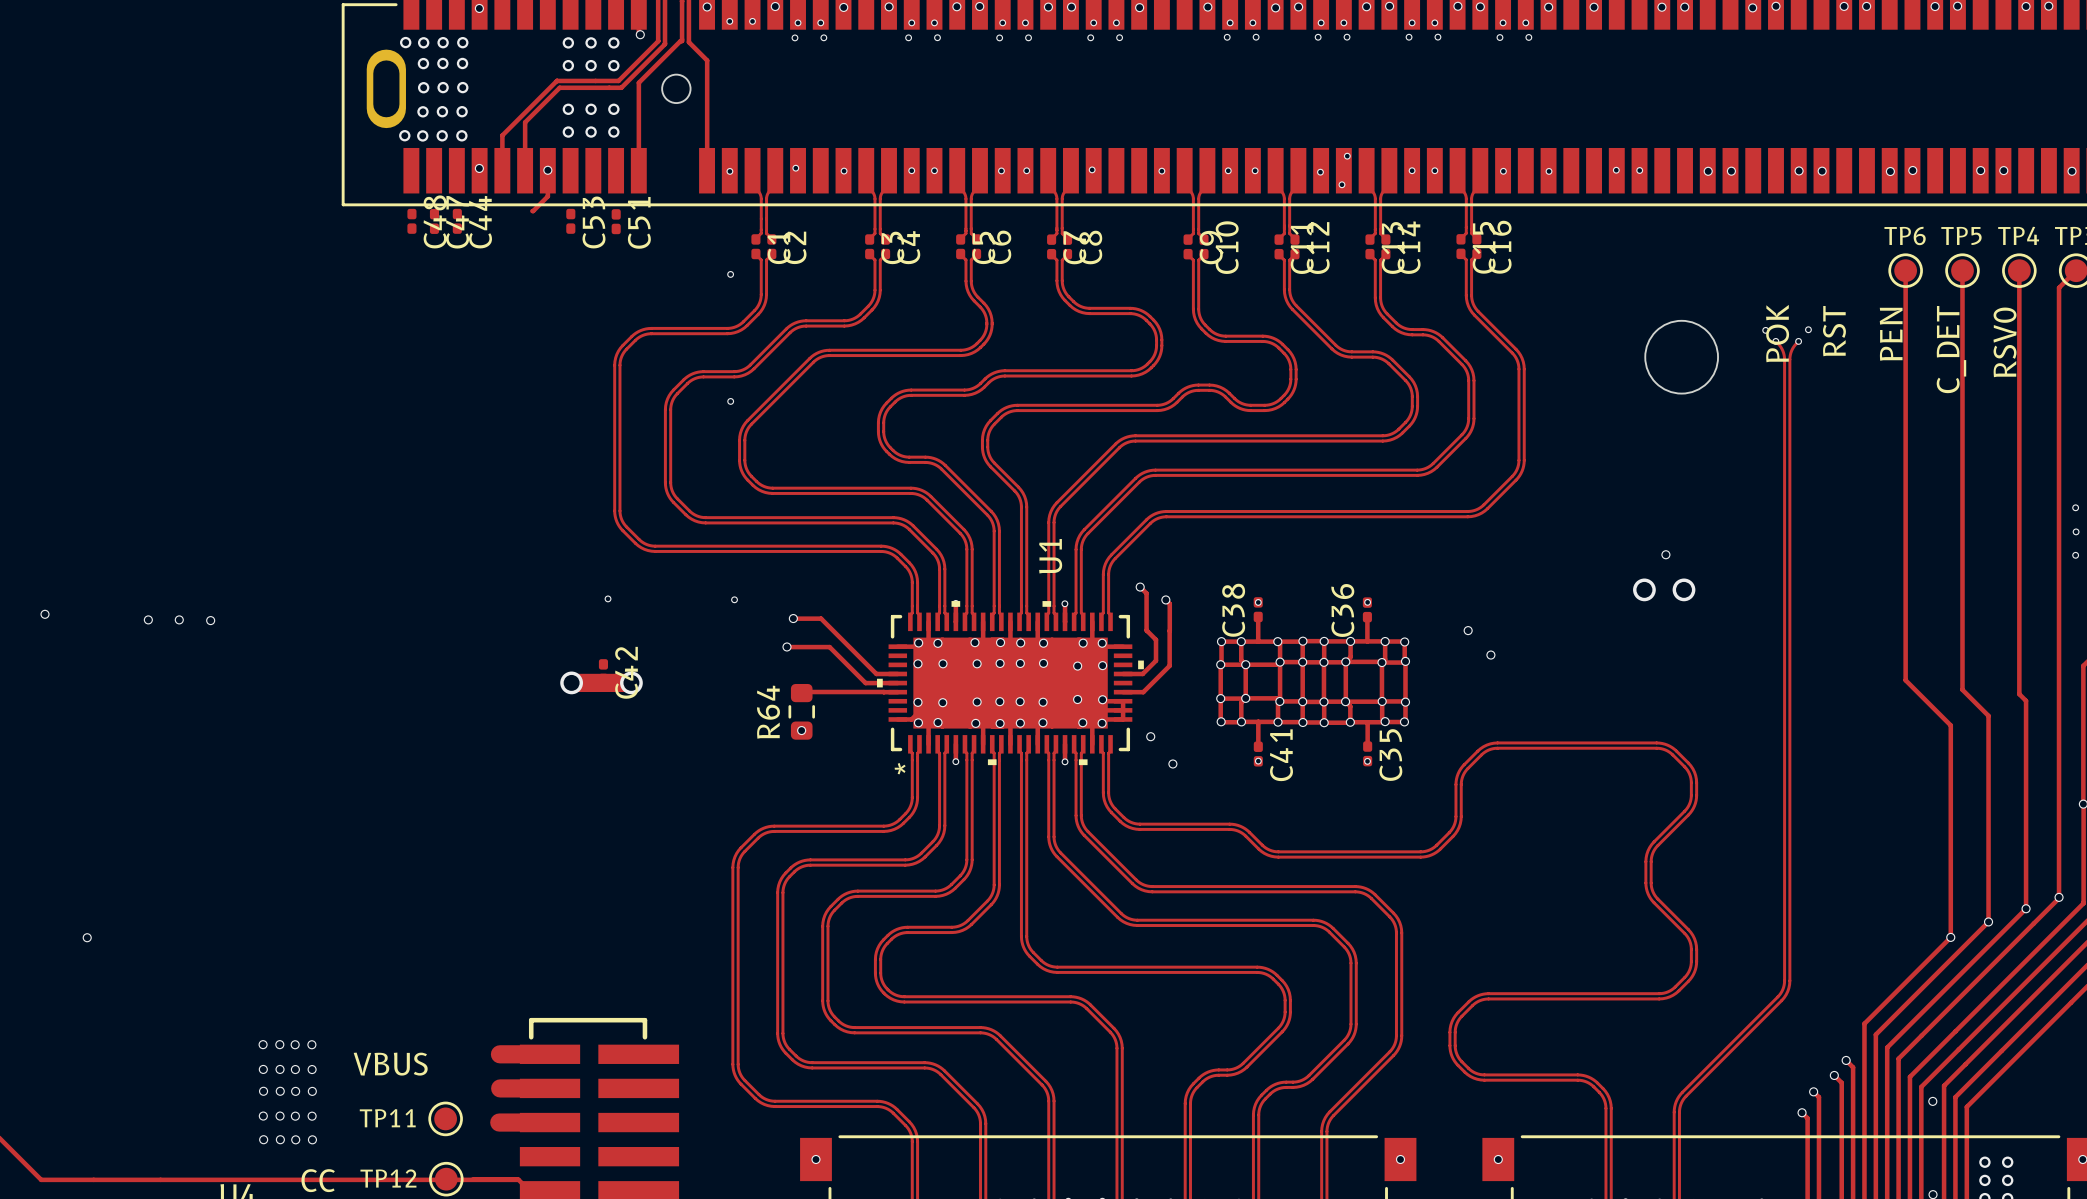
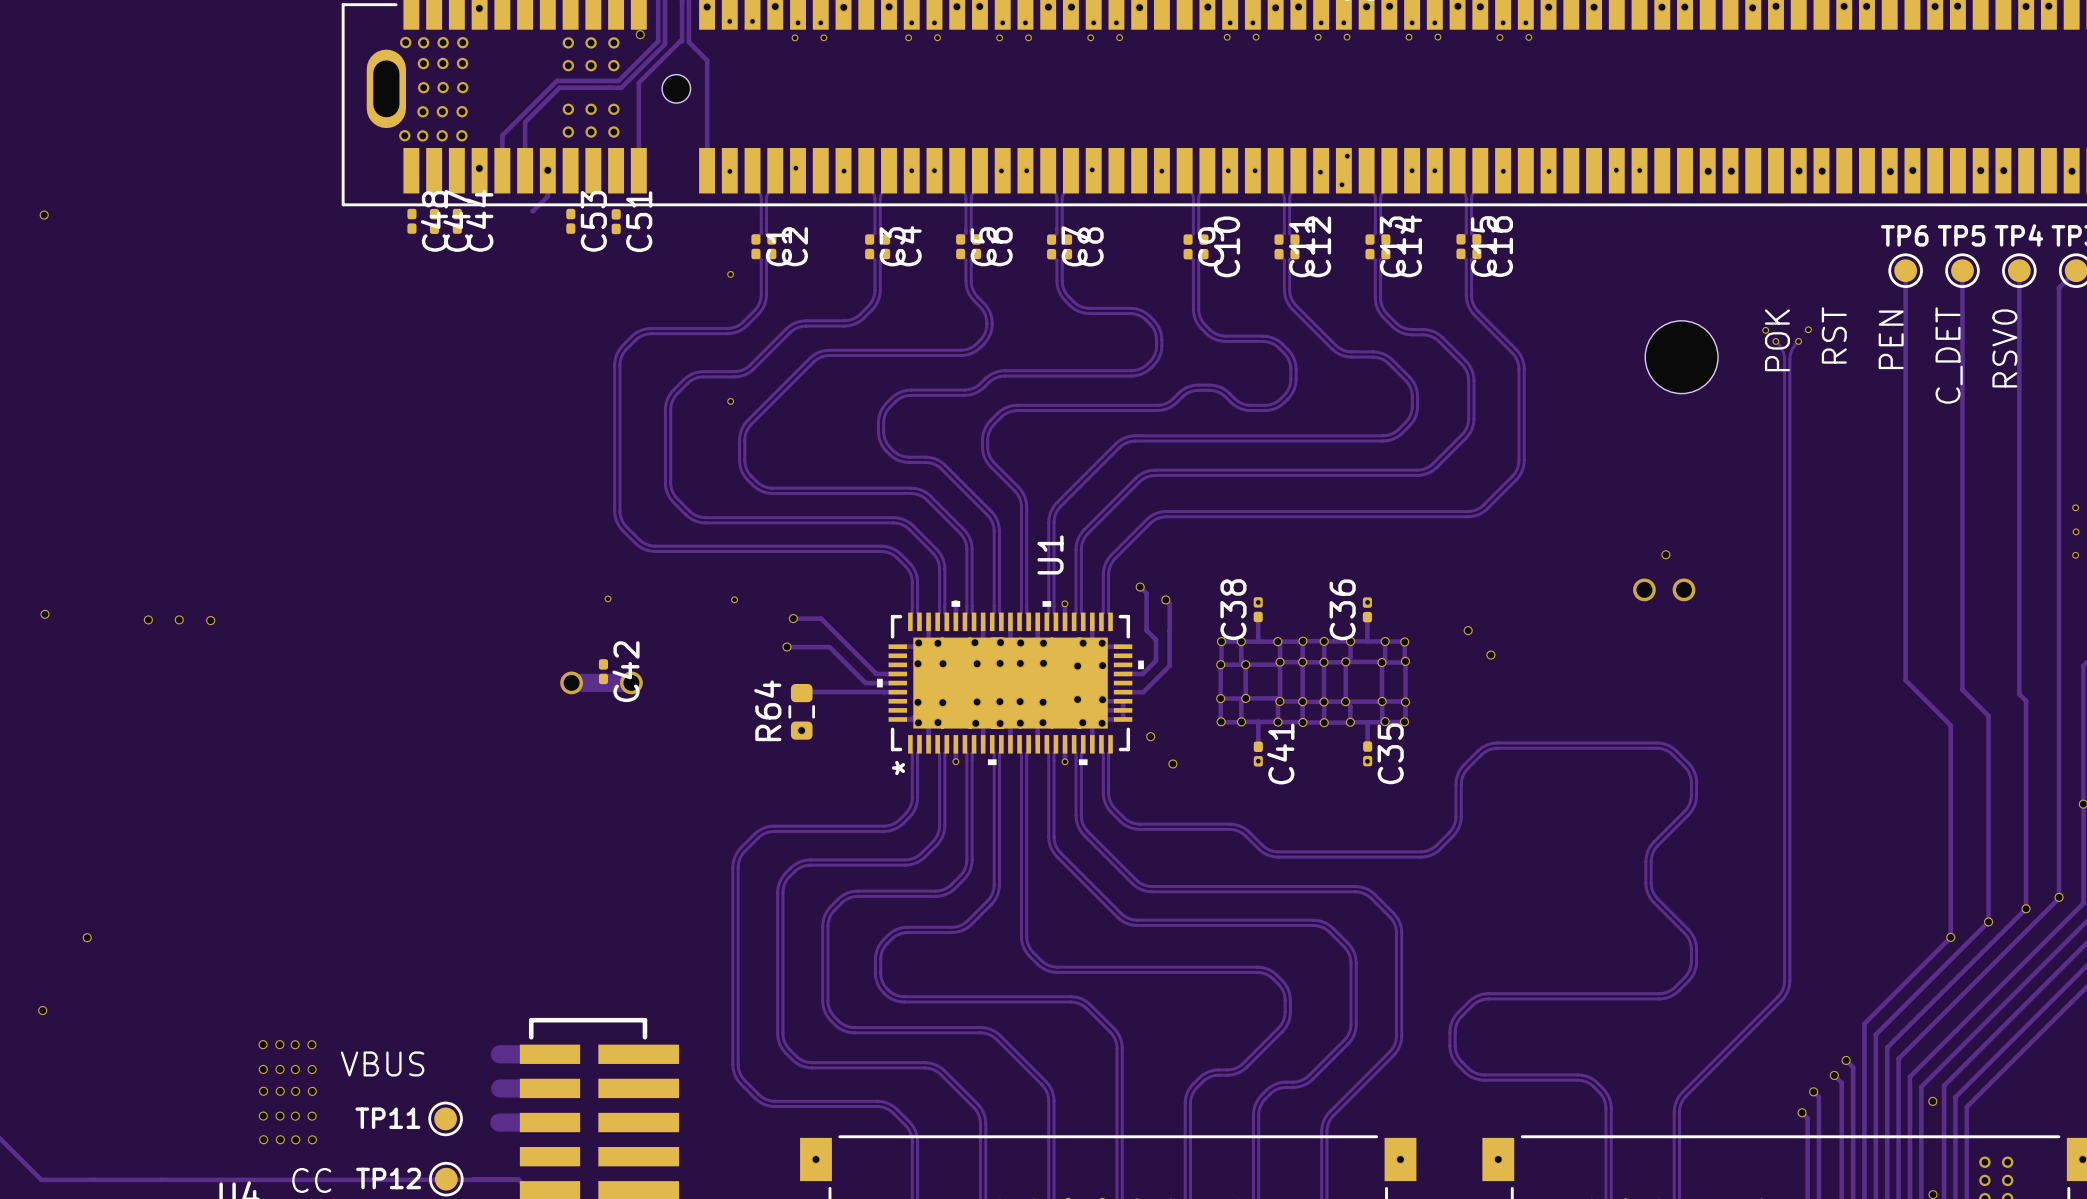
via: none -> (44, 215)
via: none -> (42, 1010)

